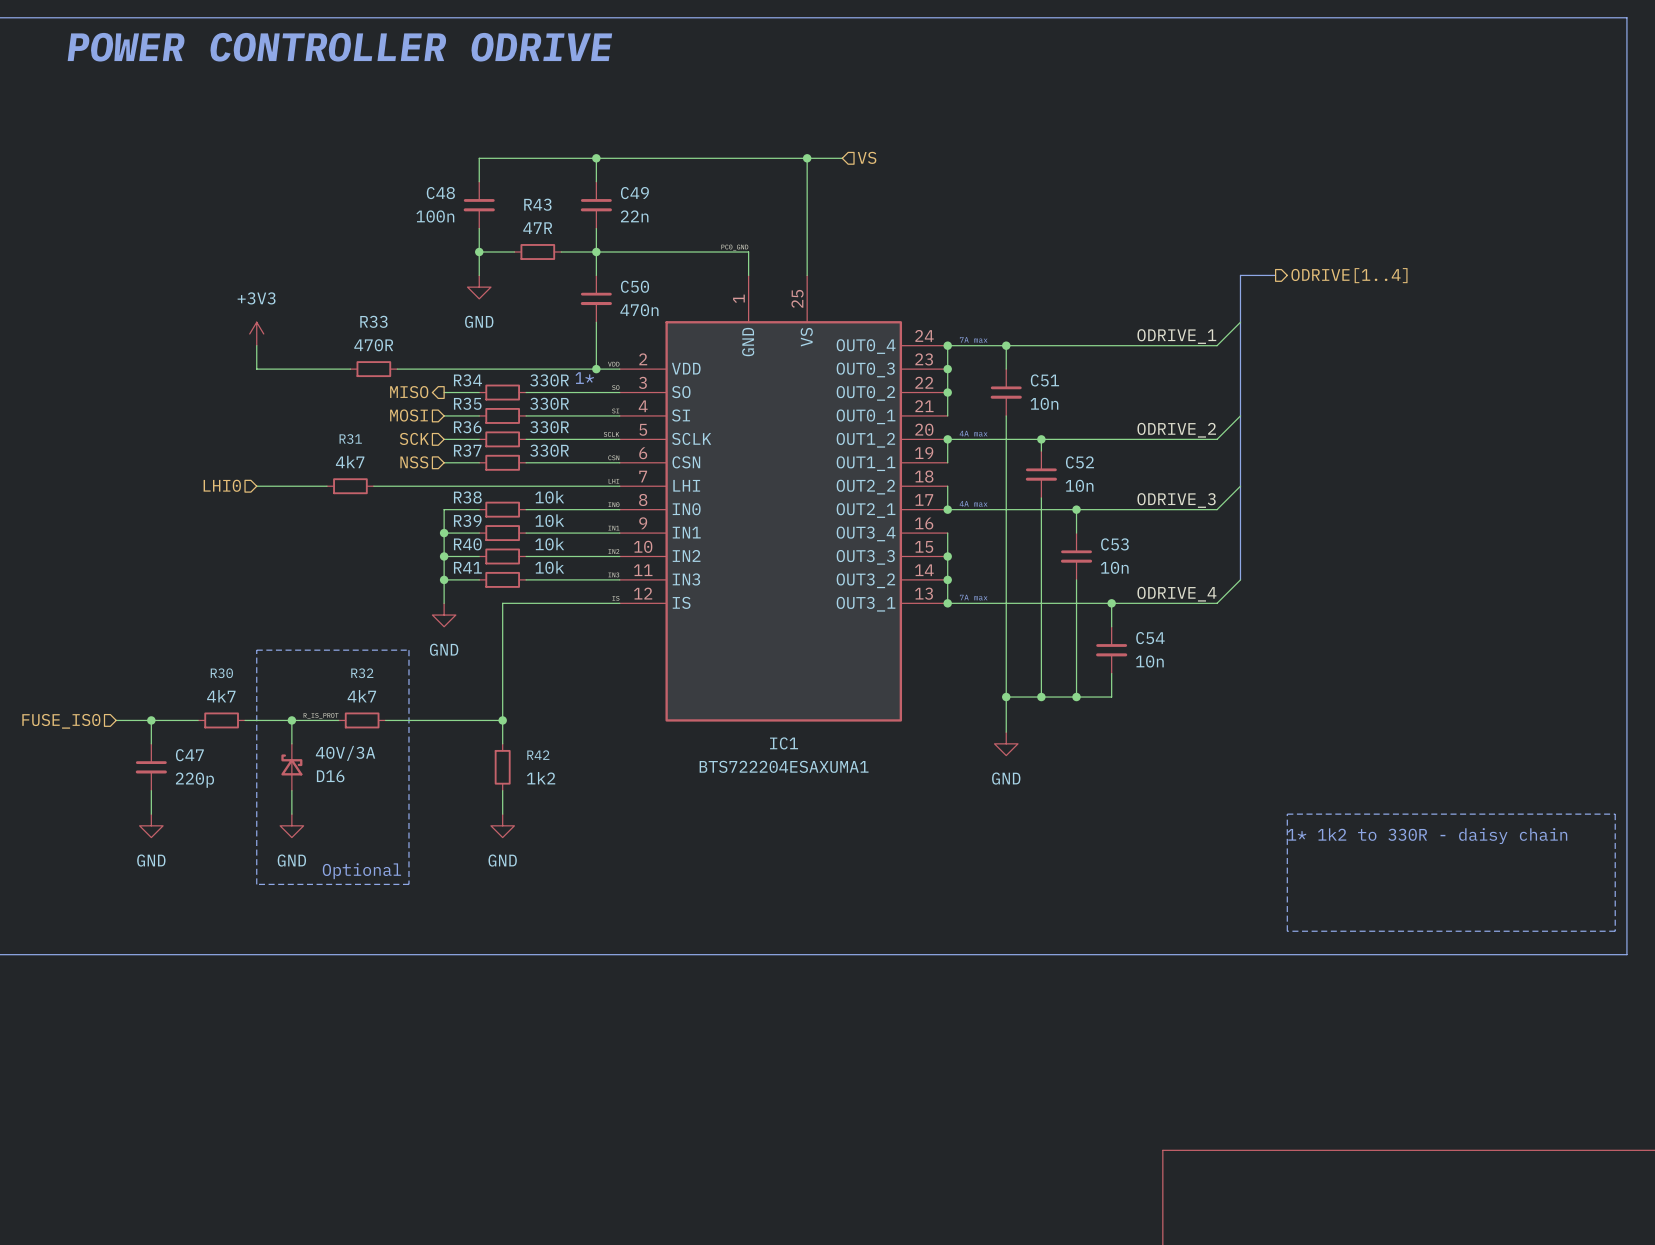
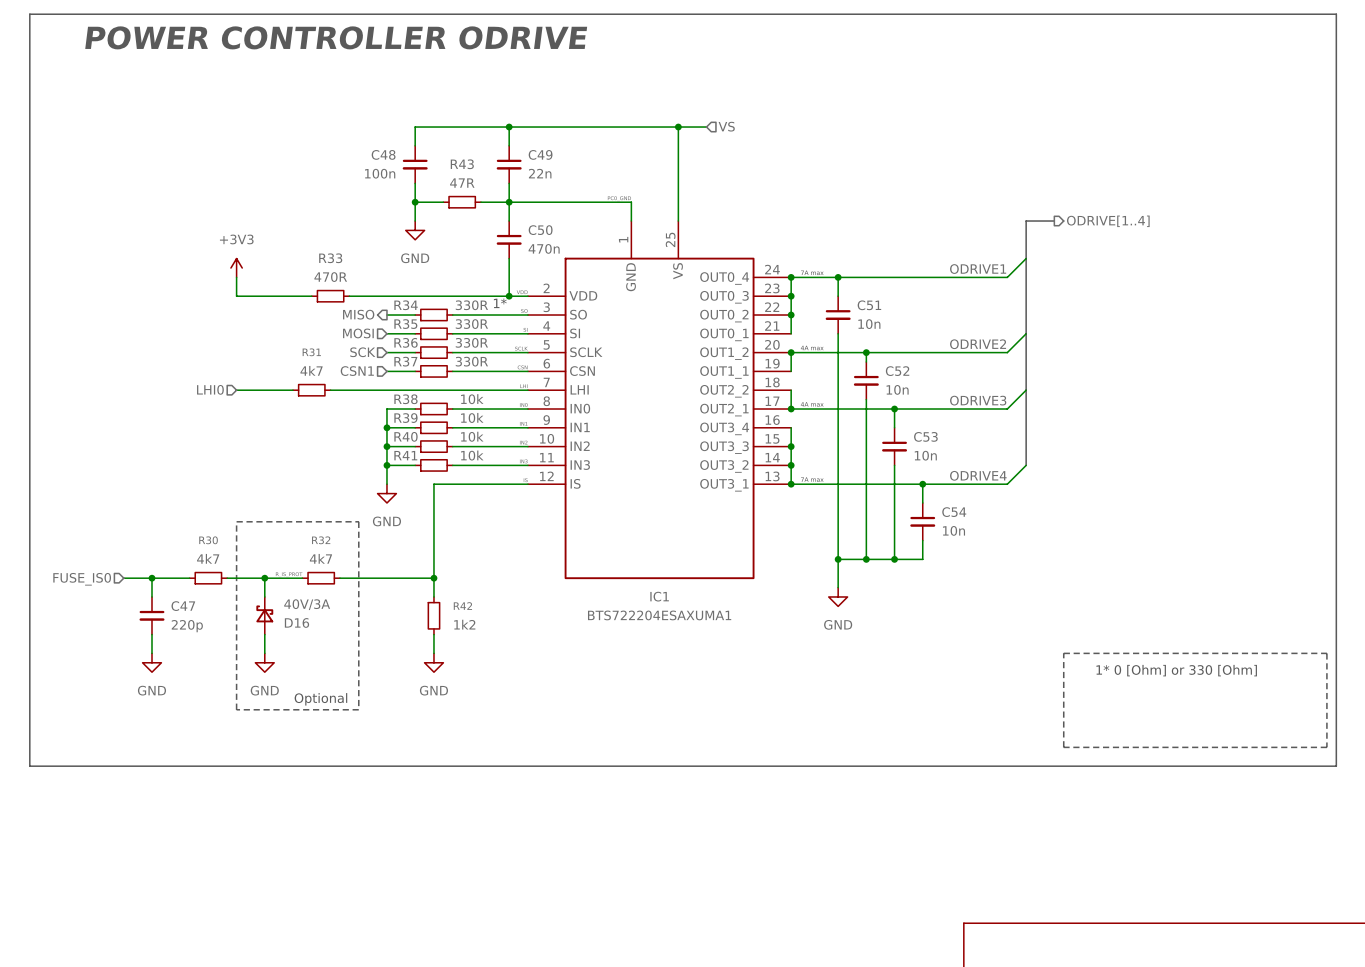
label: ODRIVE_1 (1176, 336) -> ODRIVE1 (978, 269)
label: ODRIVE_2 (1176, 430) -> ODRIVE2 (978, 344)
hierarchical label: NSS (414, 462) -> CSN1 (357, 371)
label: ODRIVE_3 (1176, 500) -> ODRIVE3 (978, 400)
label: ODRIVE_4 (1176, 594) -> ODRIVE4 (978, 475)
text: 1* 1k2 to 330R - daisy chain (1427, 836) -> 1* 0 [Ohm] or 330 [Ohm] (1176, 670)

